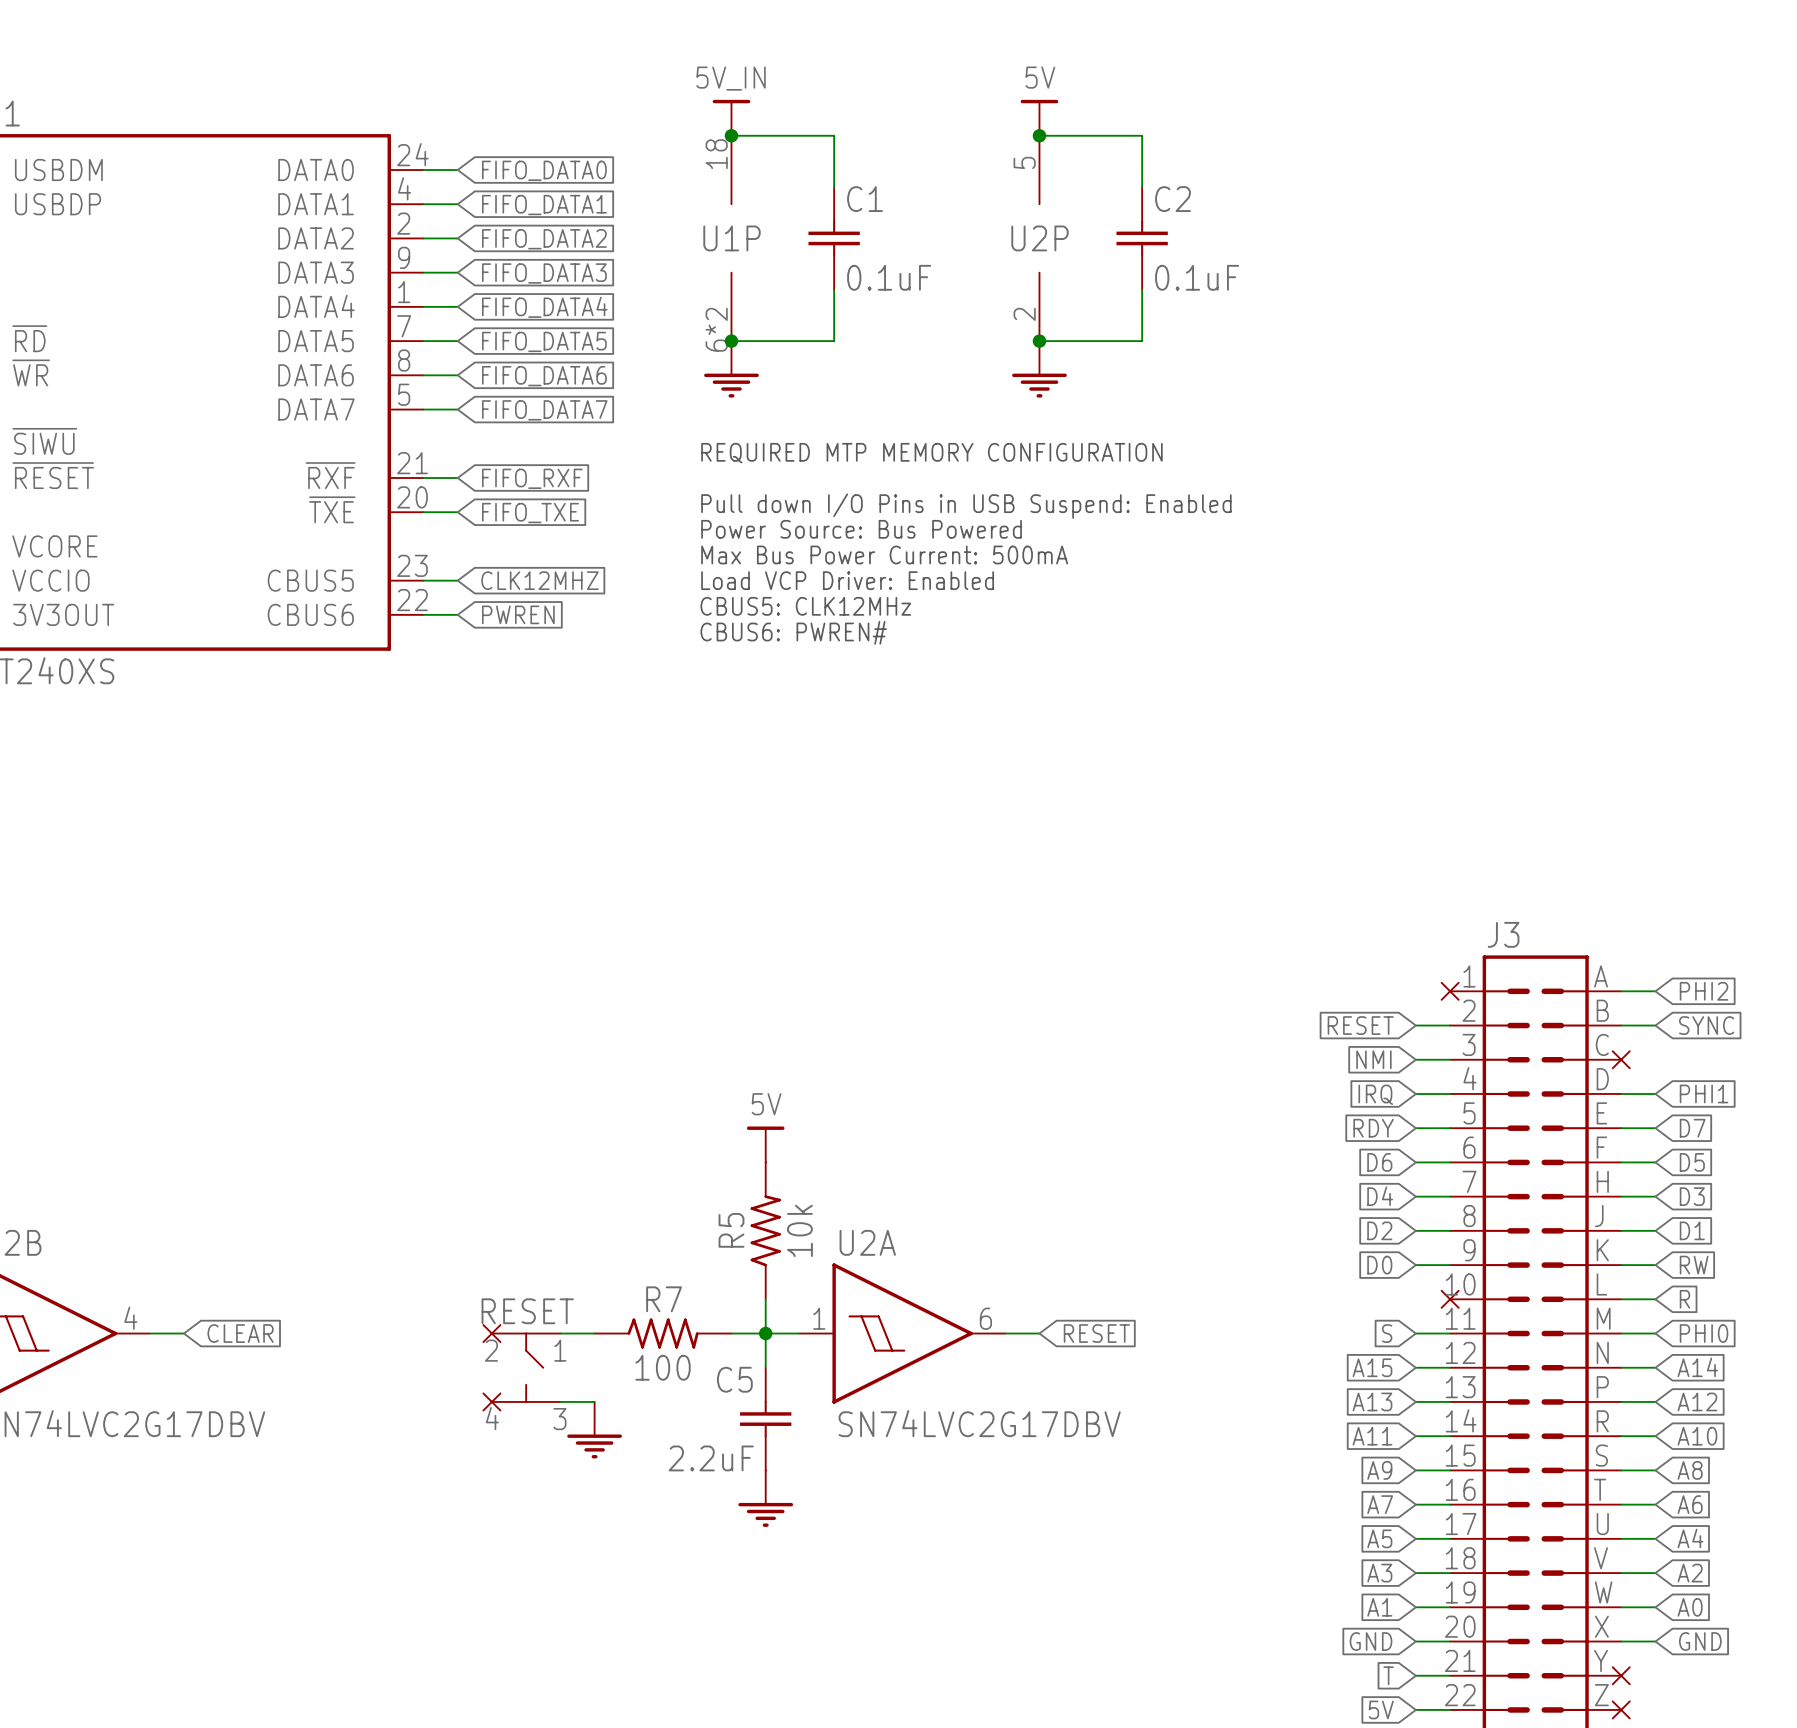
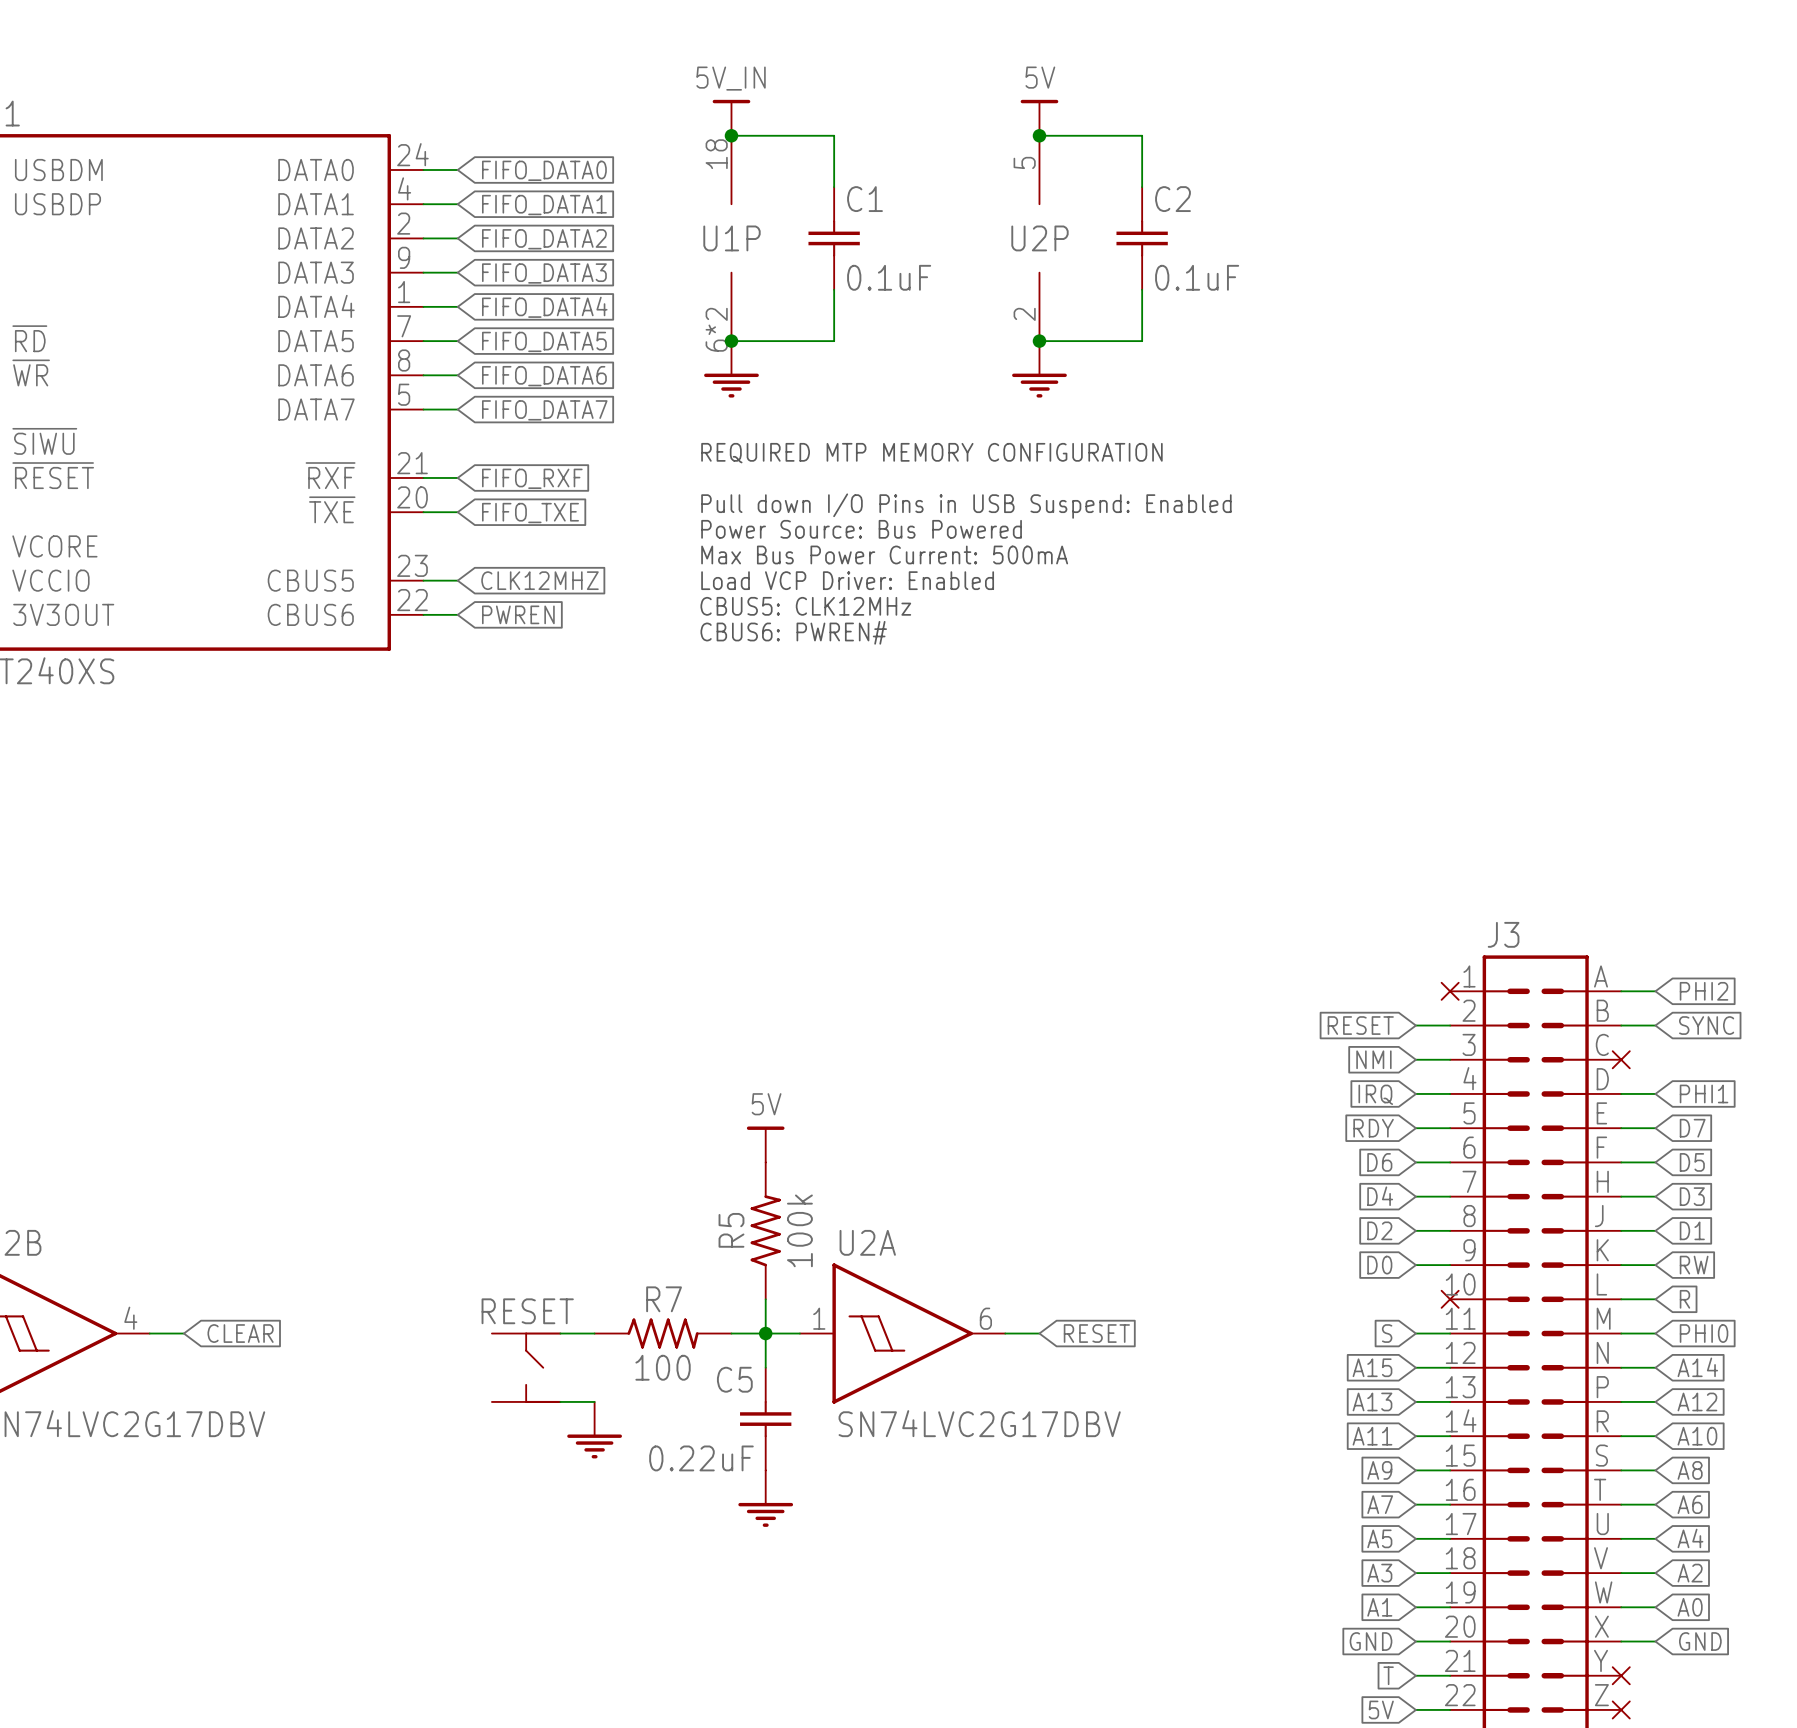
R5 value: 10k (799, 1230) -> 100k (799, 1230)
RESET symbol: [491, 1332, 561, 1403] -> [491, 1332, 562, 1404]
part: (491, 1333) -> none
part: (491, 1401) -> none
C5 value: 2.2uF (711, 1458) -> 0.22uF (701, 1458)

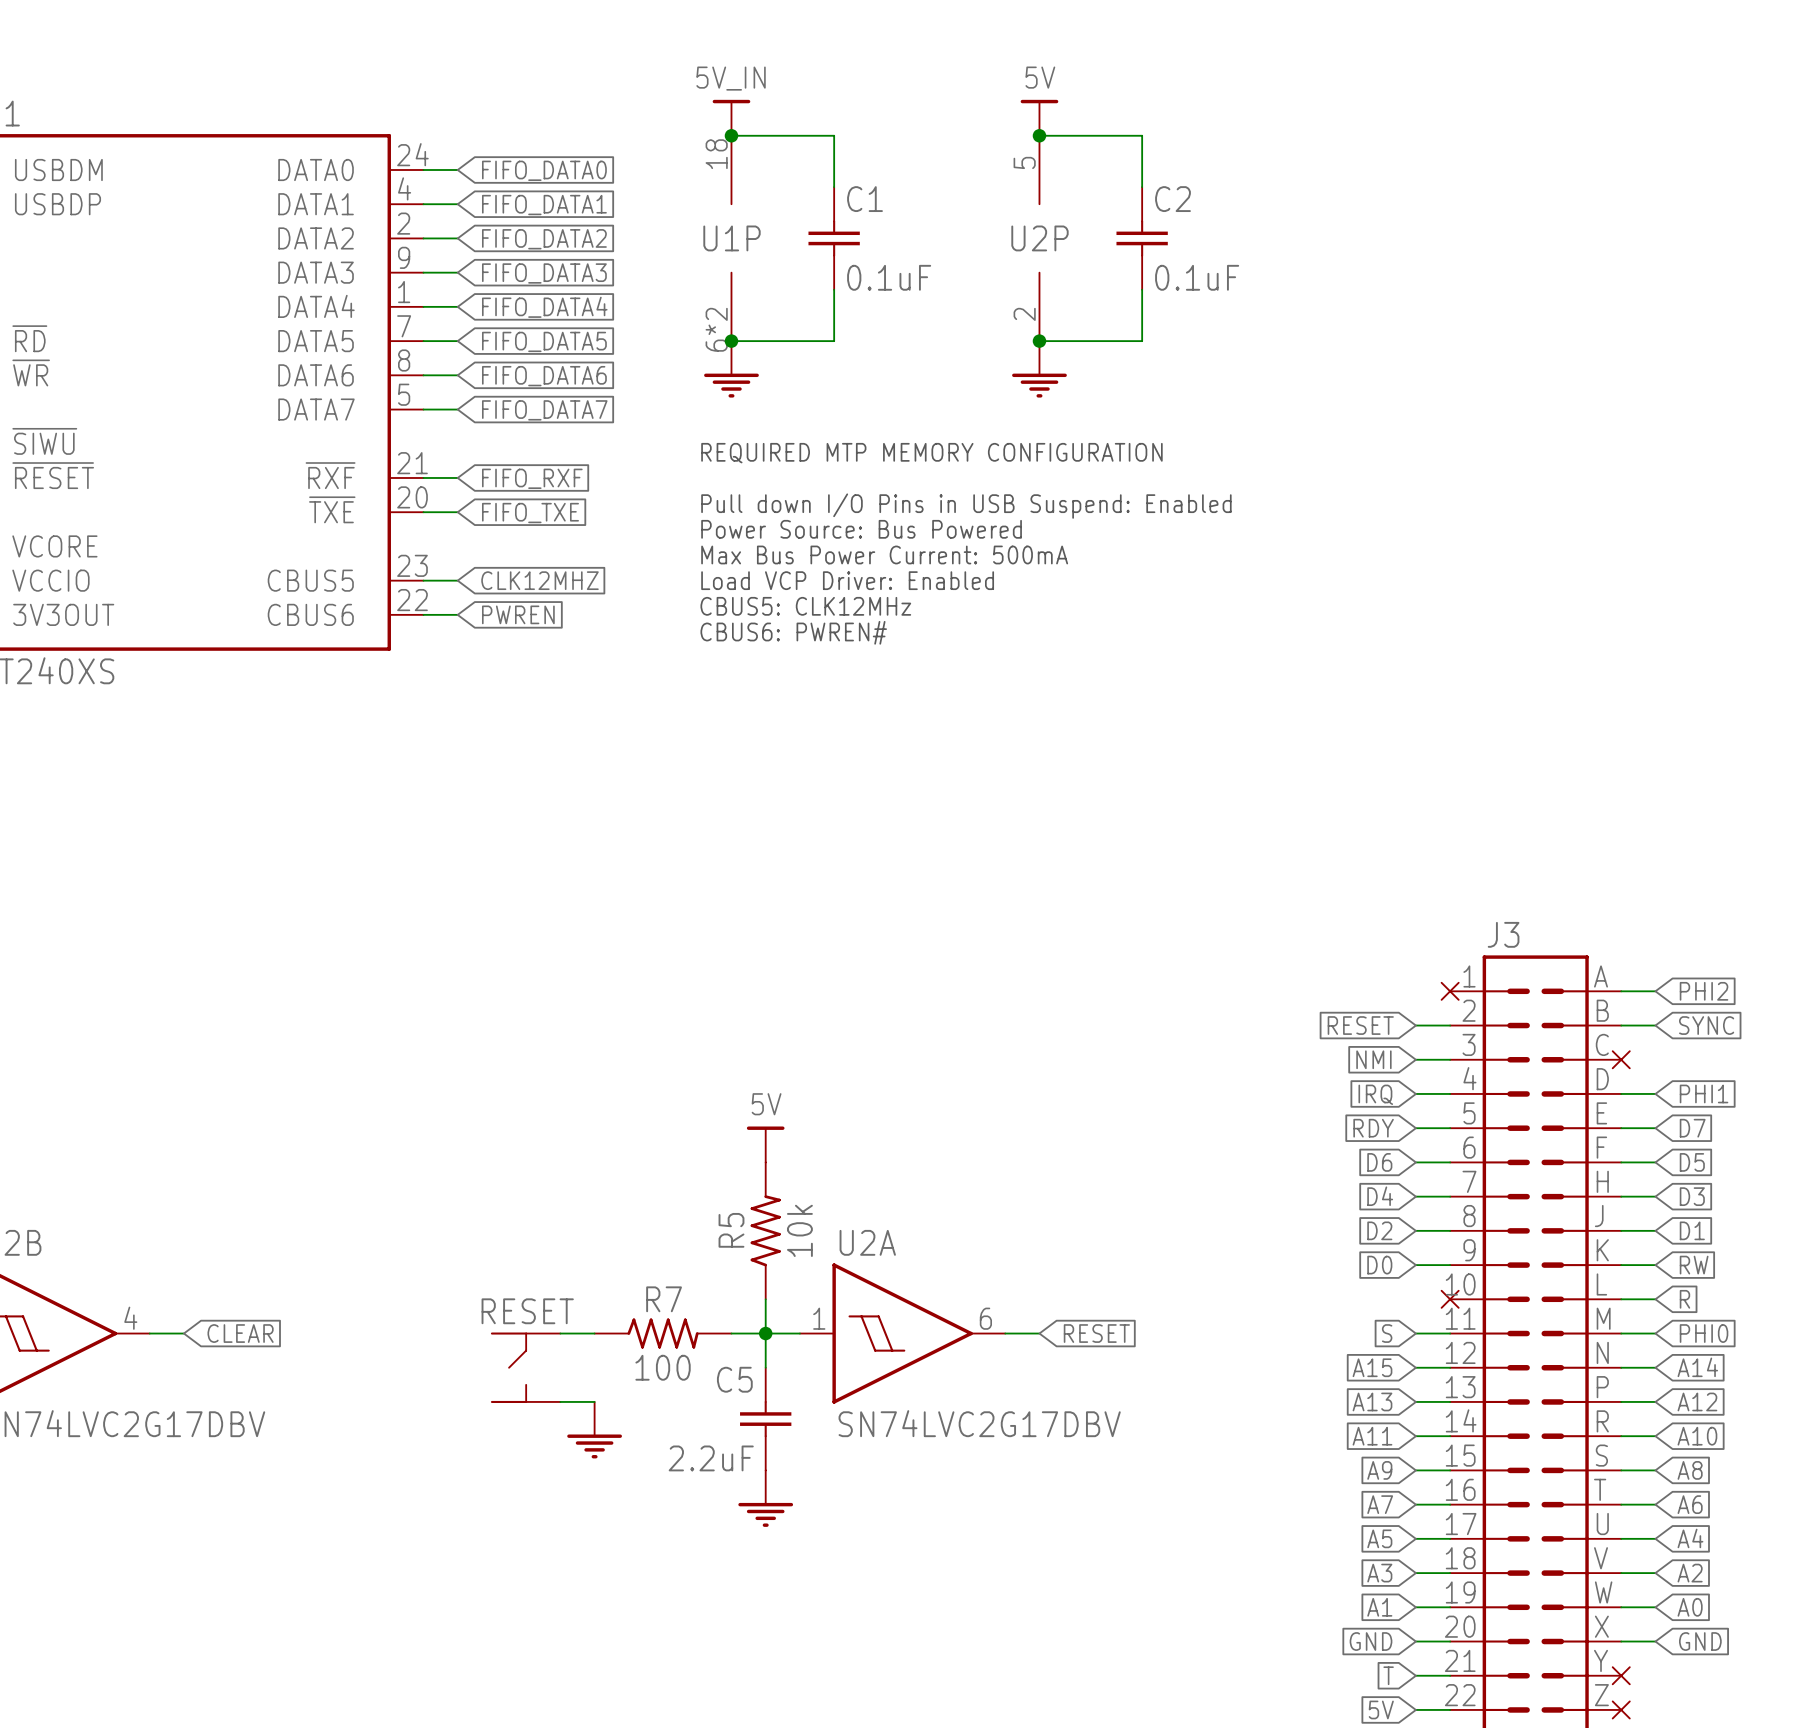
R5 value: 100k (799, 1230) -> 10k (799, 1230)
RESET flip: as is (543, 1367) -> left-right (509, 1367)
C5 value: 0.22uF (701, 1458) -> 2.2uF (711, 1458)

